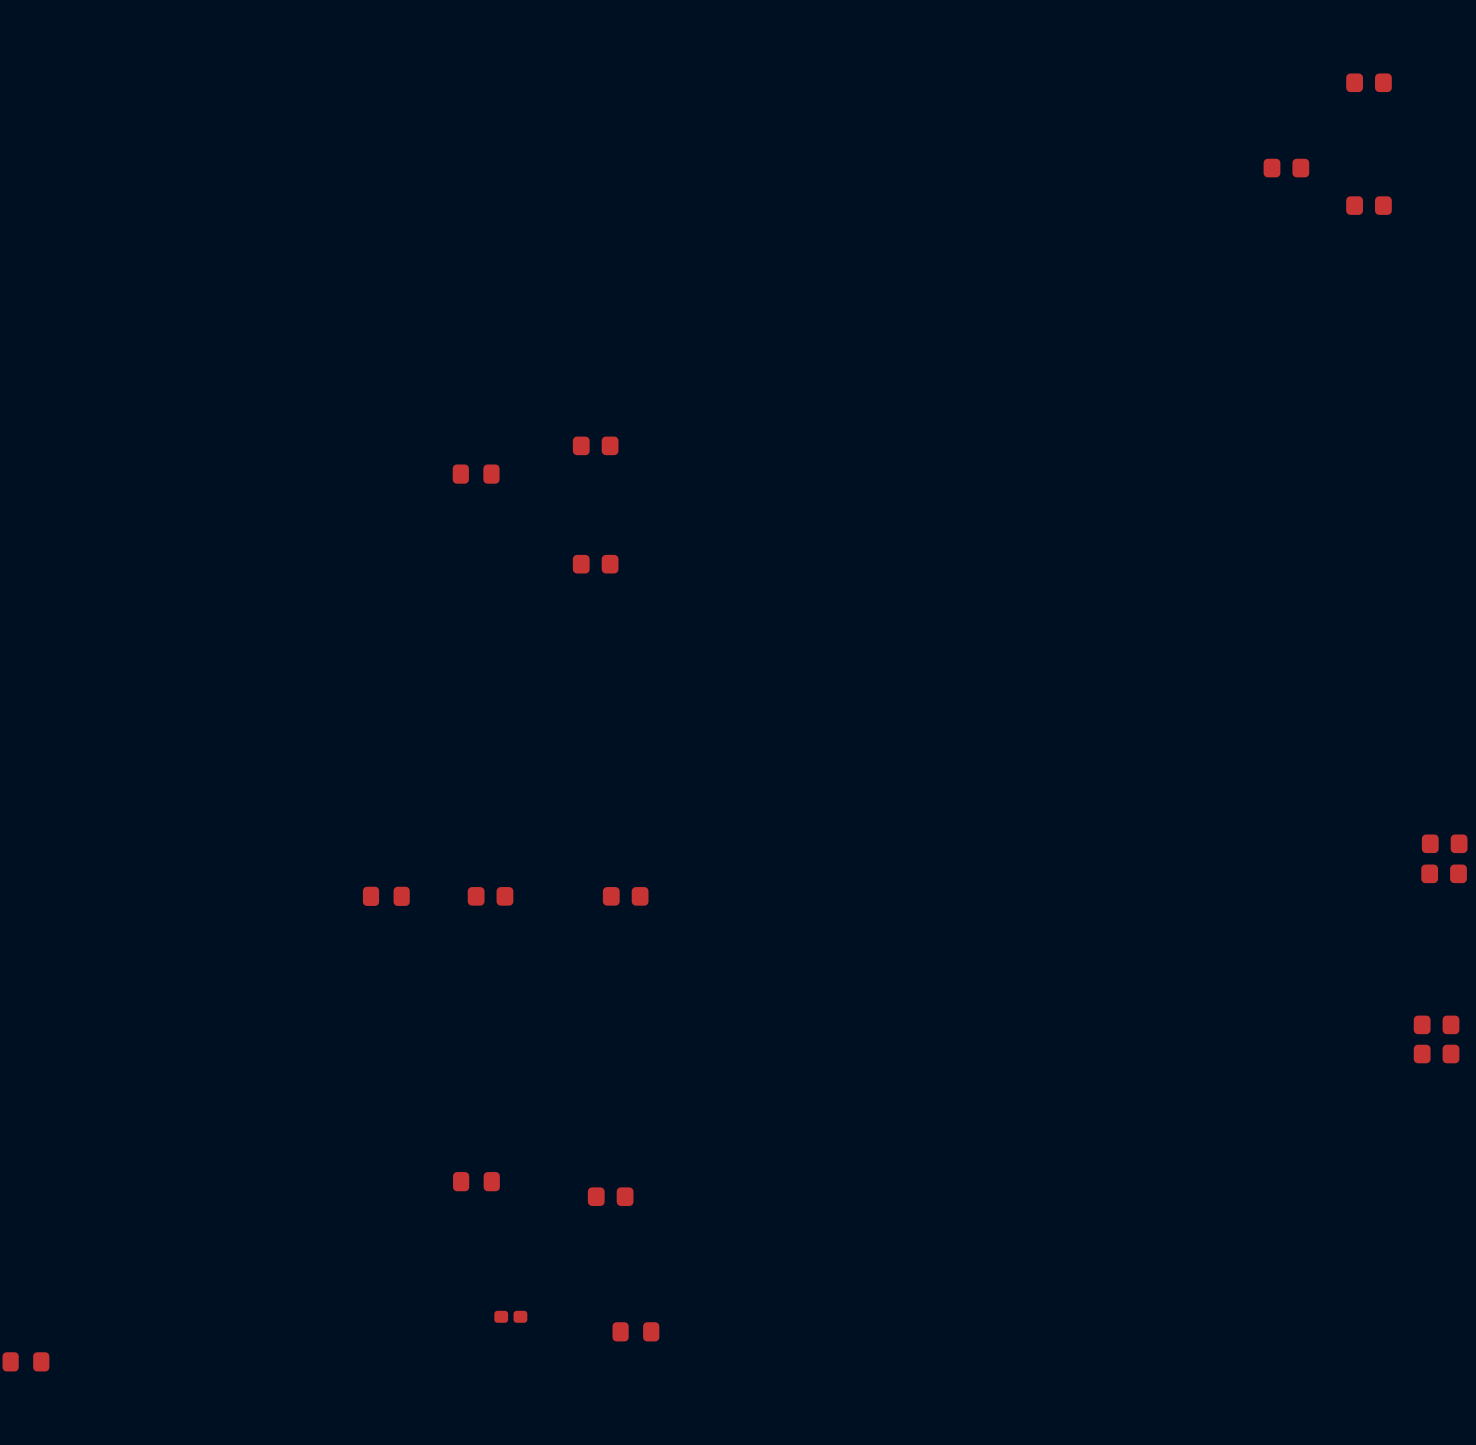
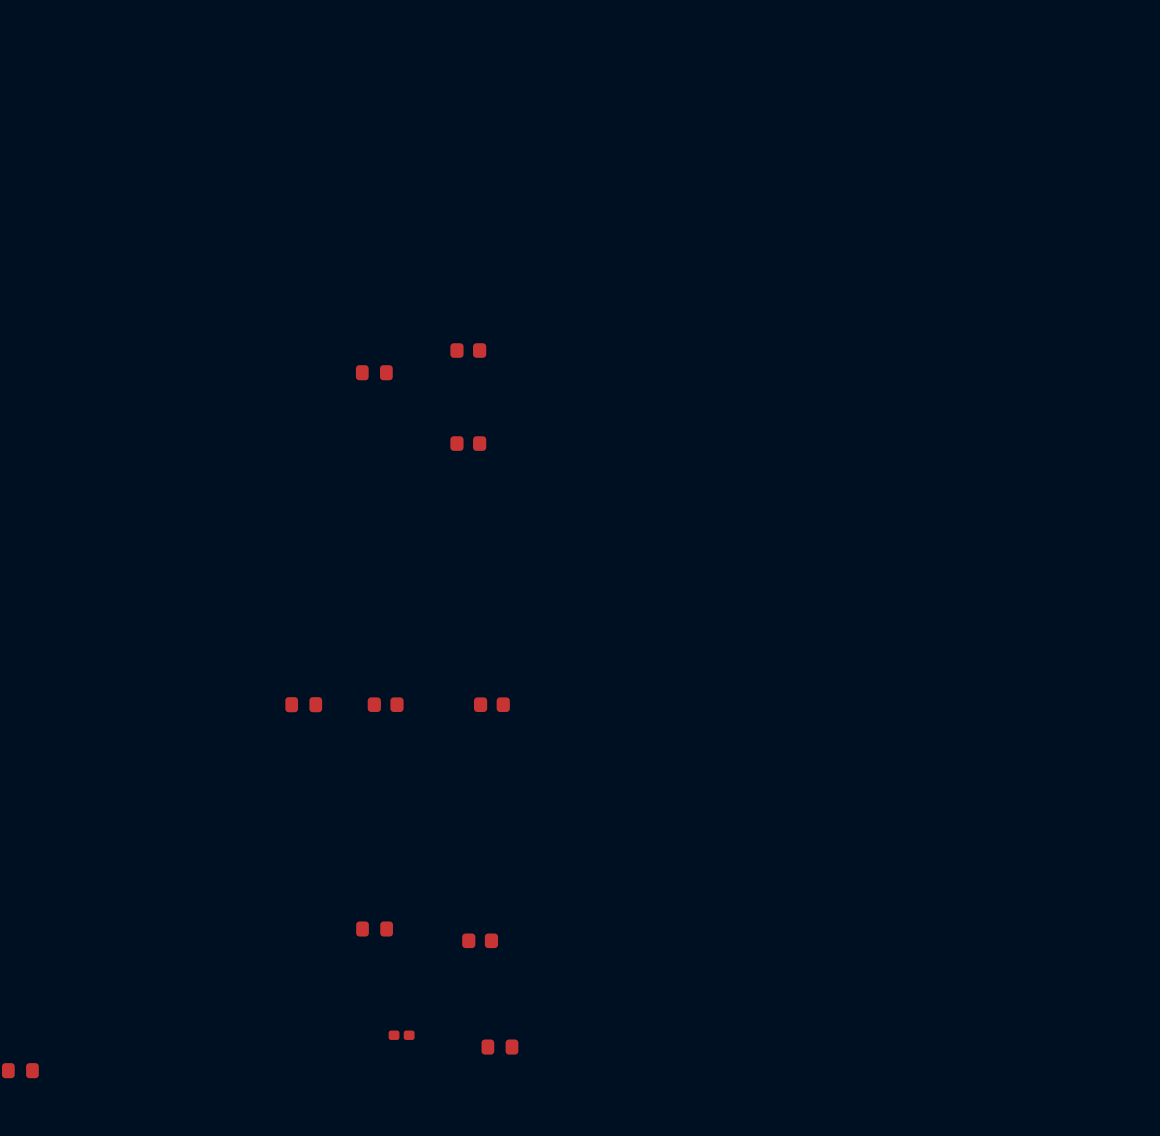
part: (1368, 82) -> none
part: (1286, 168) -> none
part: (1368, 205) -> none
part: (1444, 843) -> none
part: (1444, 873) -> none
part: (1436, 1024) -> none
part: (1436, 1054) -> none

